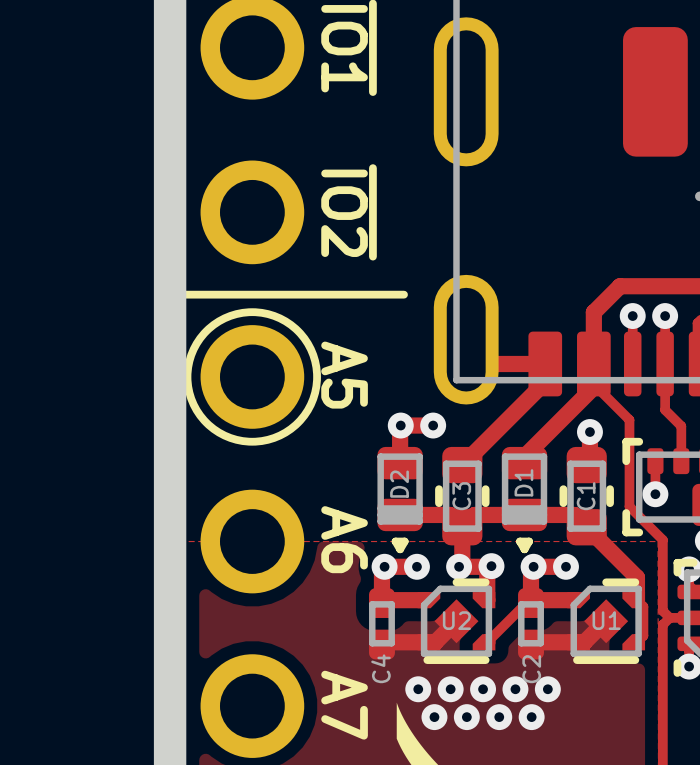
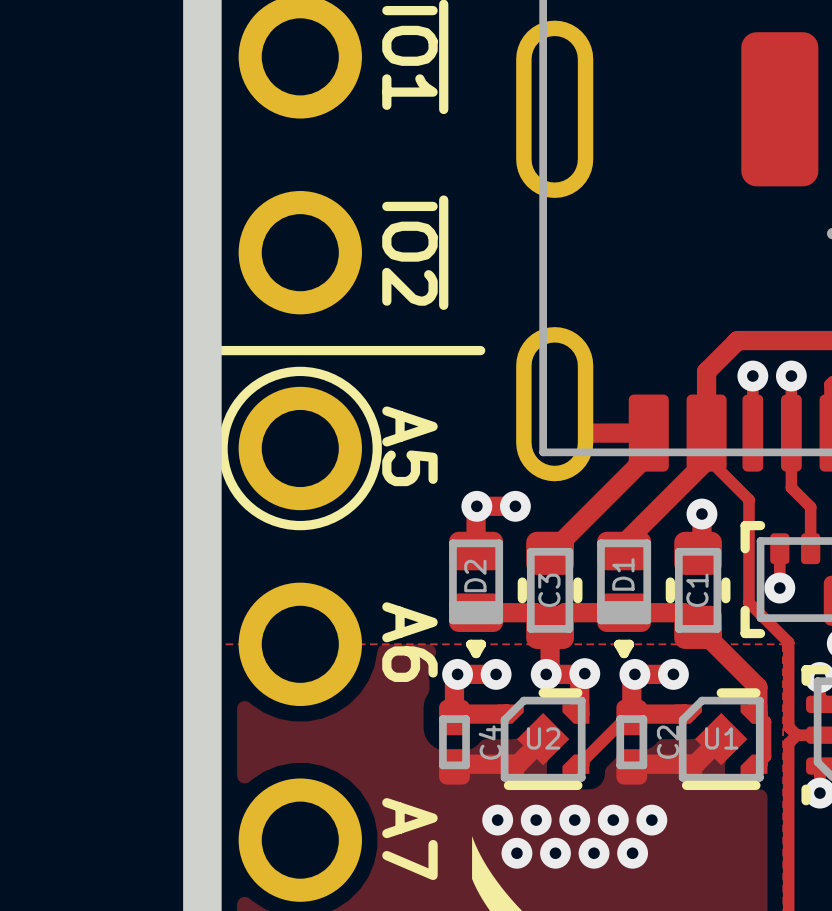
C4 name position: C4 (380, 668) -> C4 (490, 742)
C2 name position: C2 (531, 669) -> C2 (668, 742)

